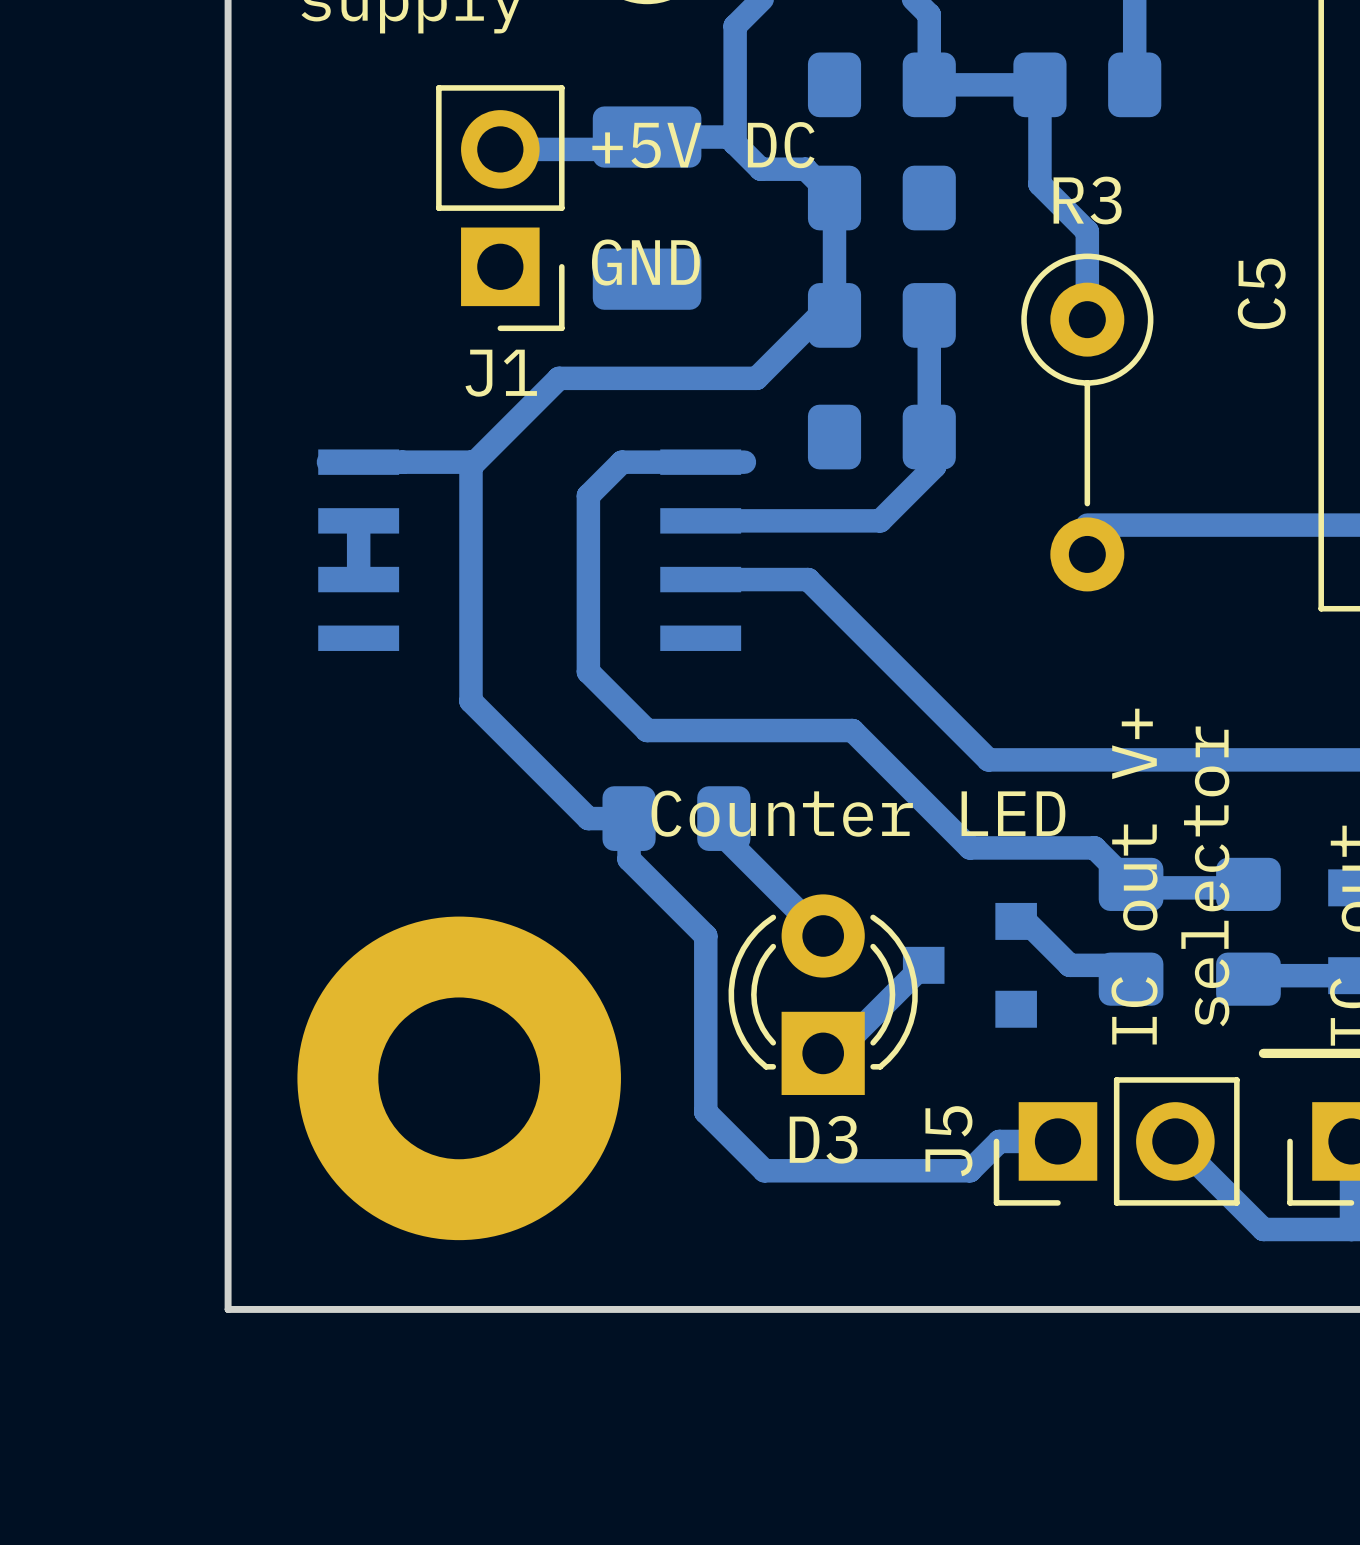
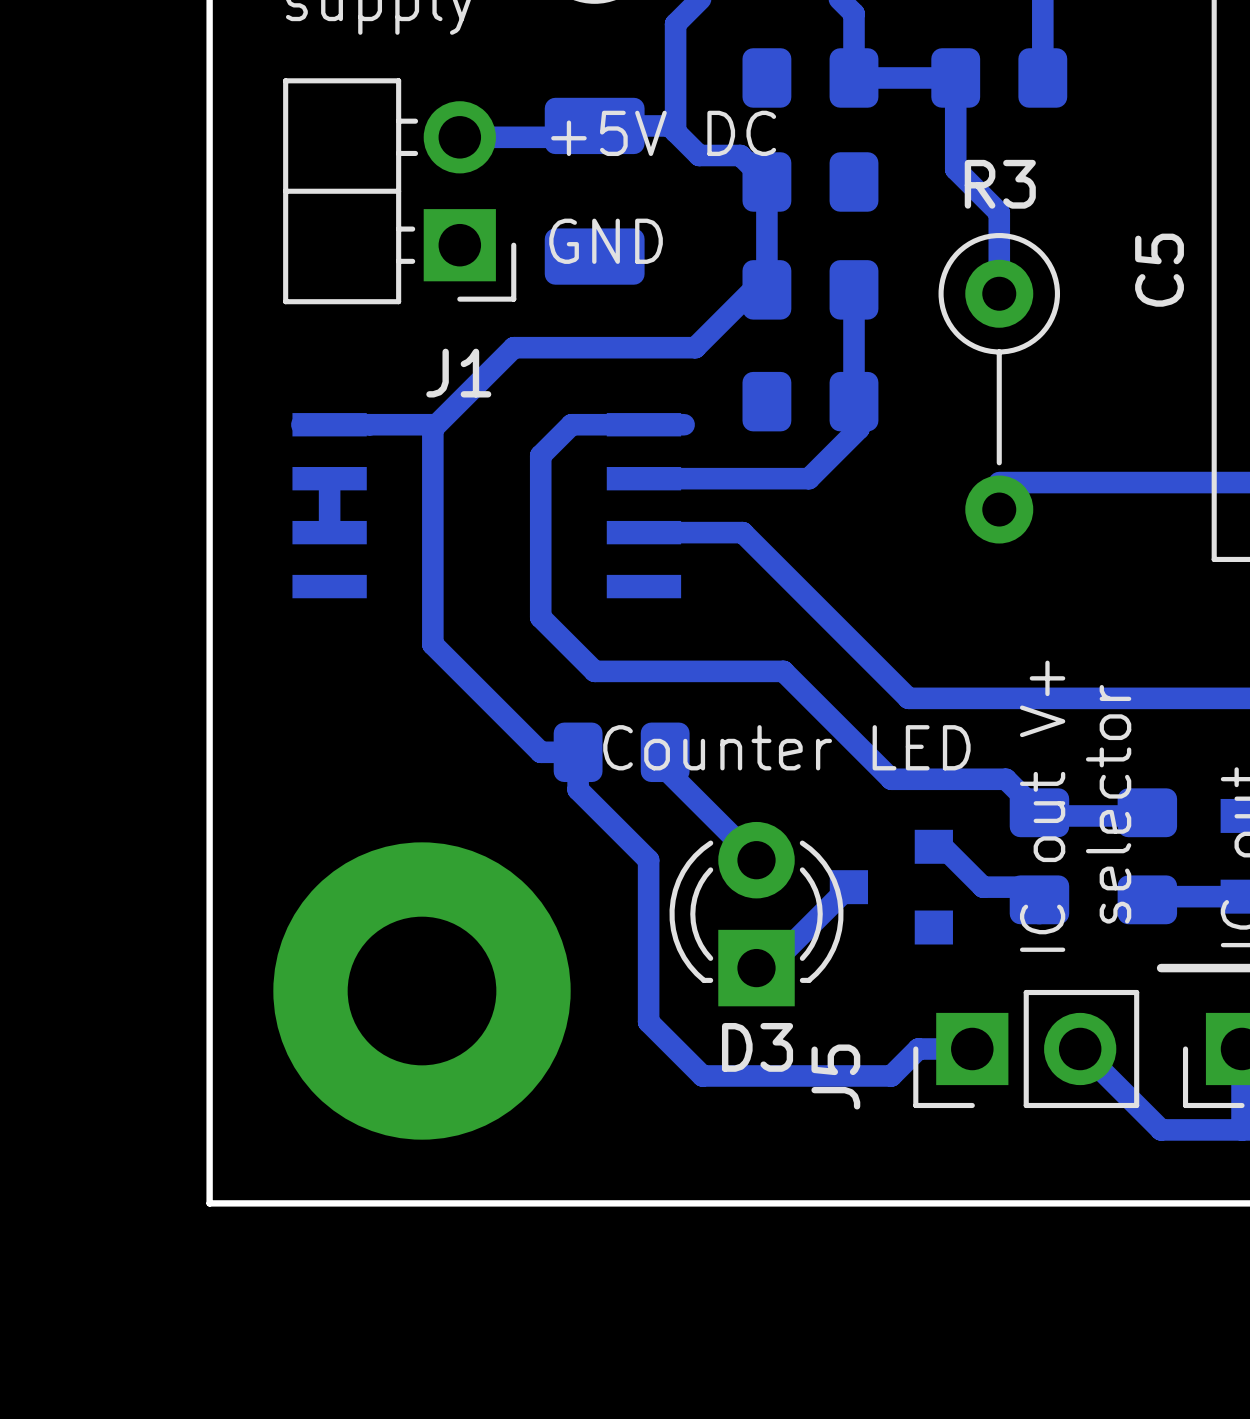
J1 footprint: [436, 85, 565, 332] -> [283, 78, 517, 305]
J5 name position: J5 (948, 1141) -> J5 (835, 1076)

